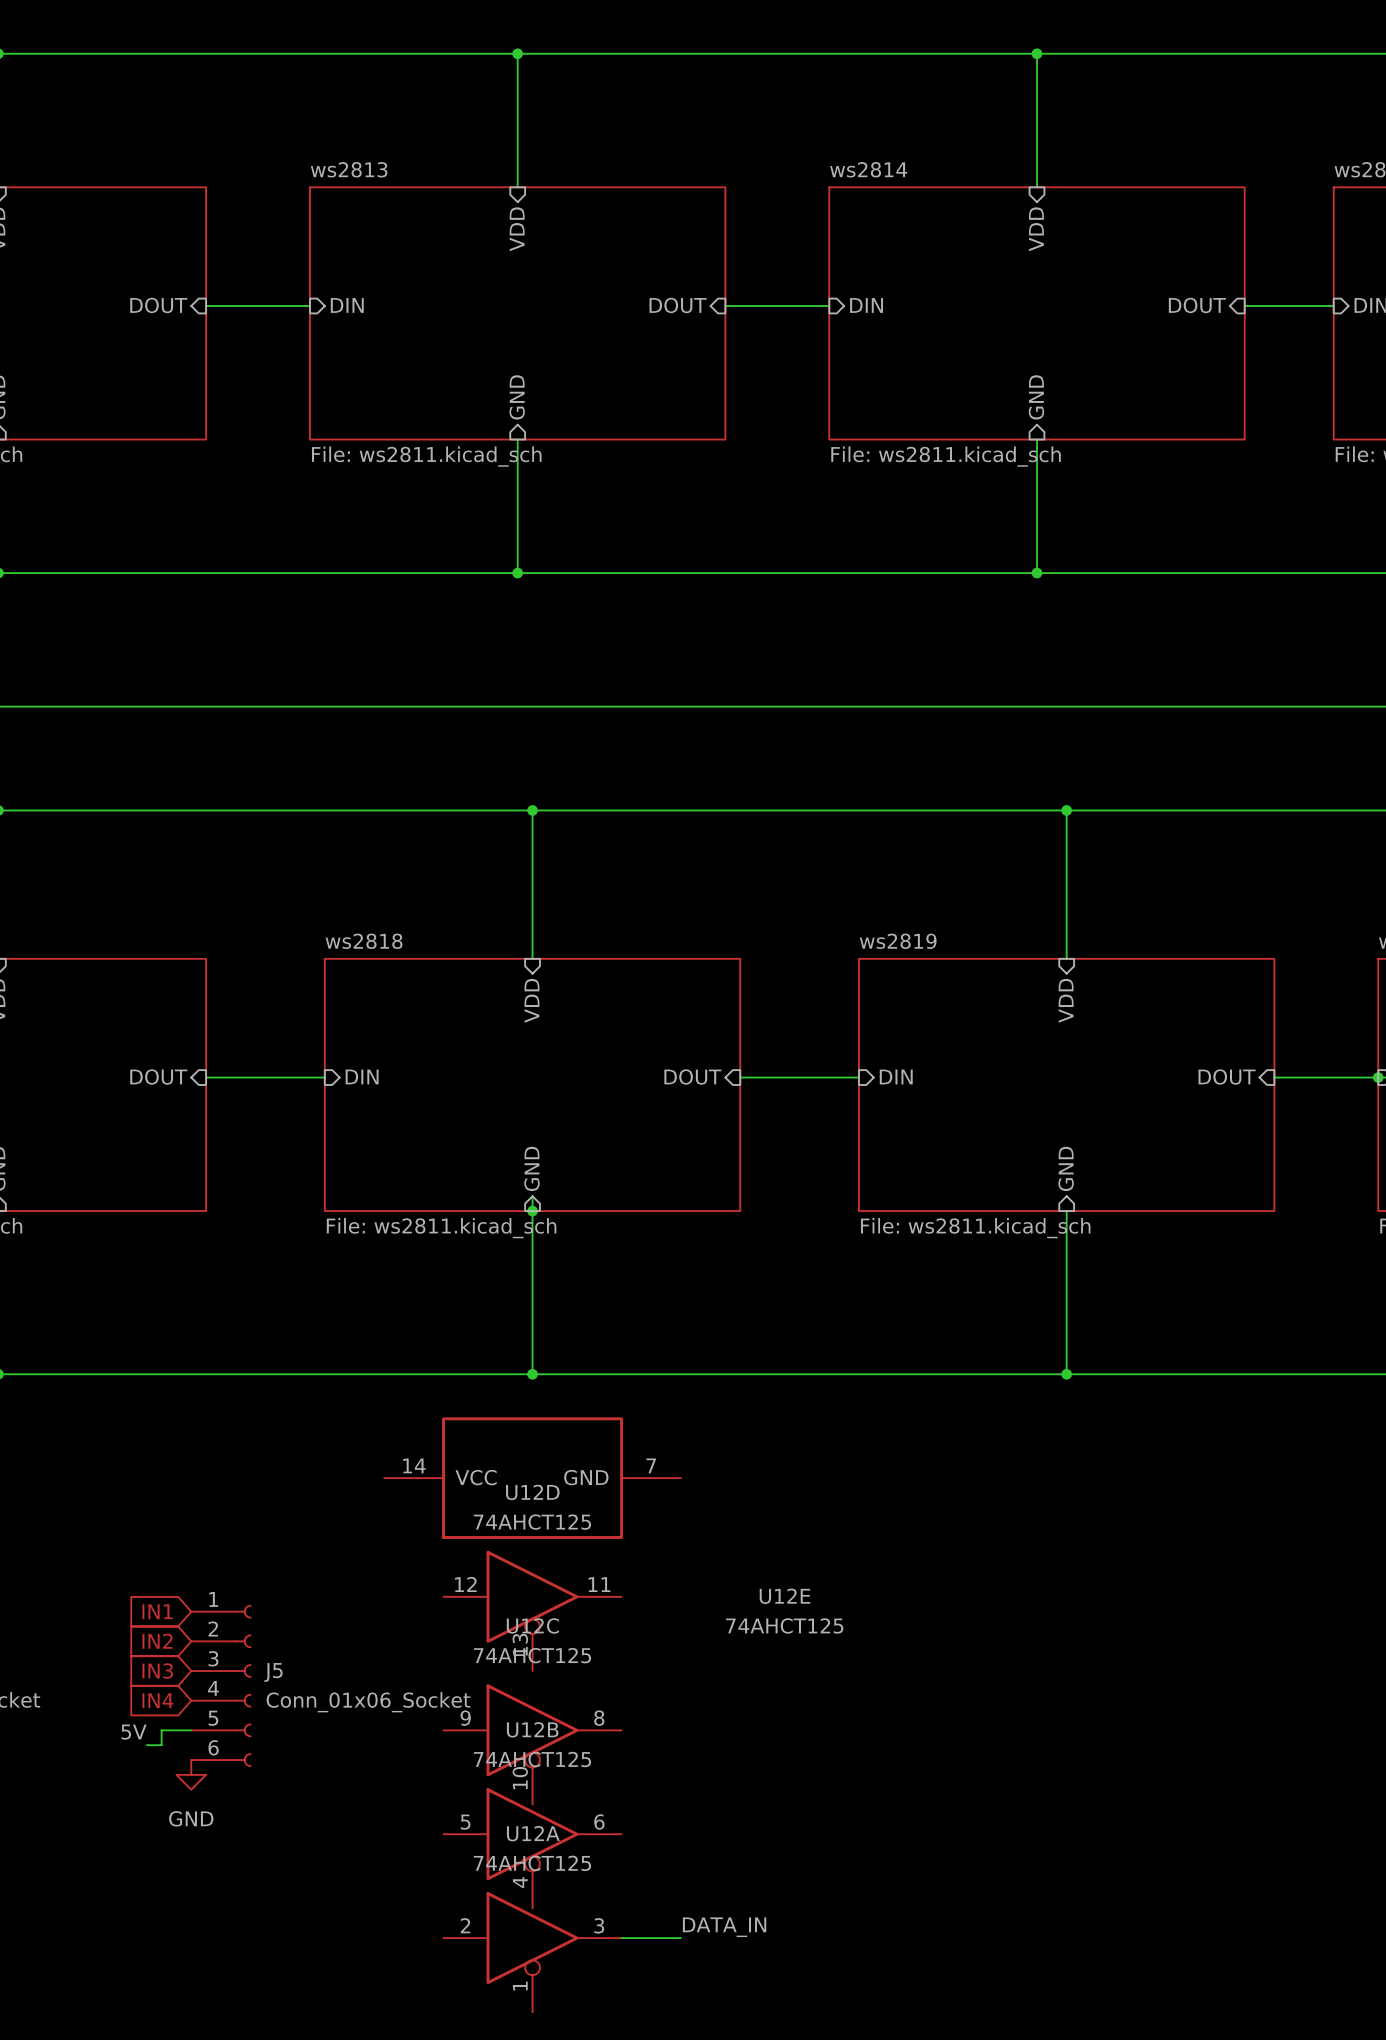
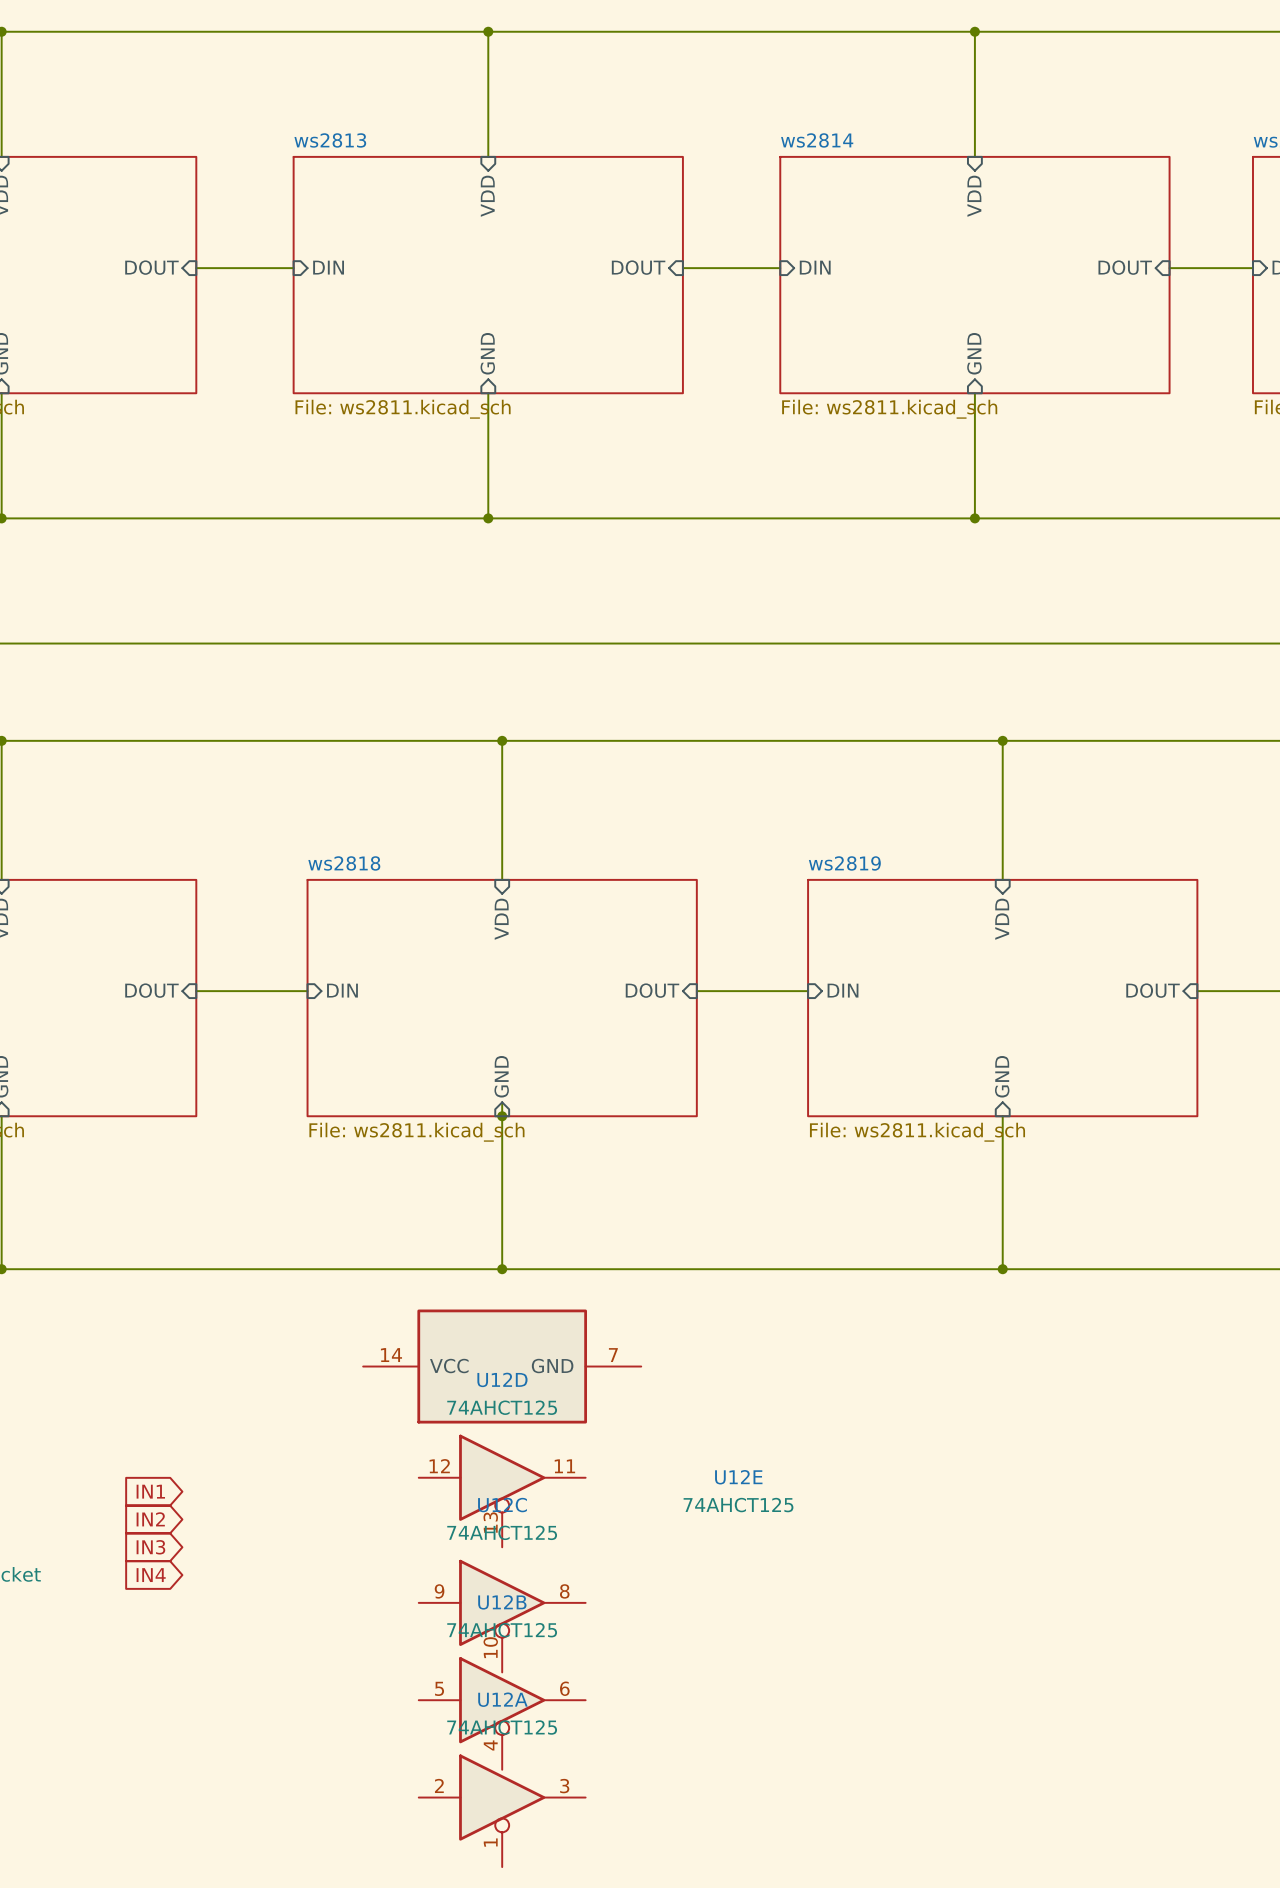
J5: Conn_01x06_Socket (221, 1685) -> none
wire: (191, 1730) (161, 1730) (161, 1745) (146, 1745) -> none
label: 5V (134, 1732) -> none
power symbol: GND (191, 1774) -> none
label: DATA_IN (724, 1927) -> none
wire: (621, 1938) (680, 1938) -> none

